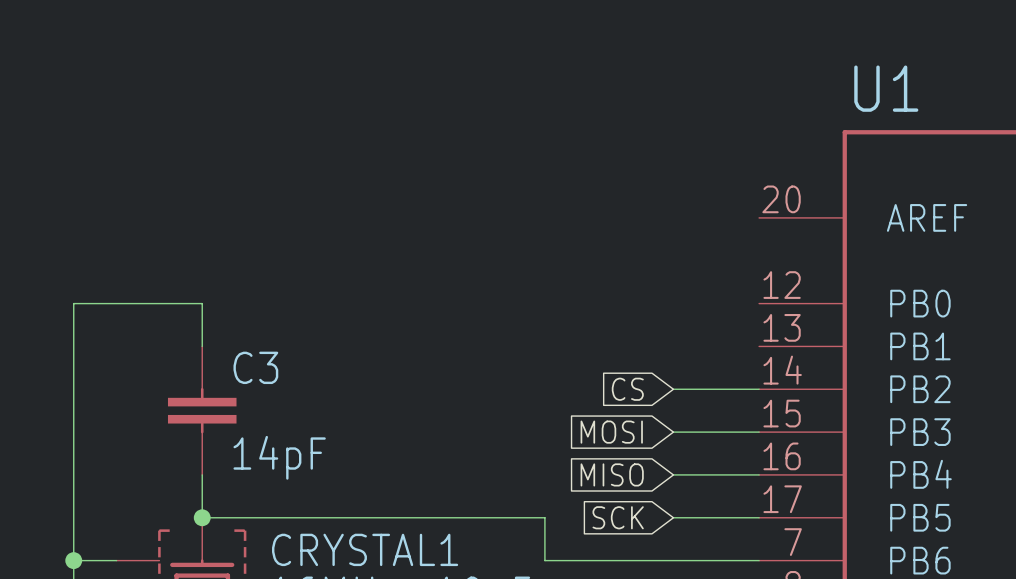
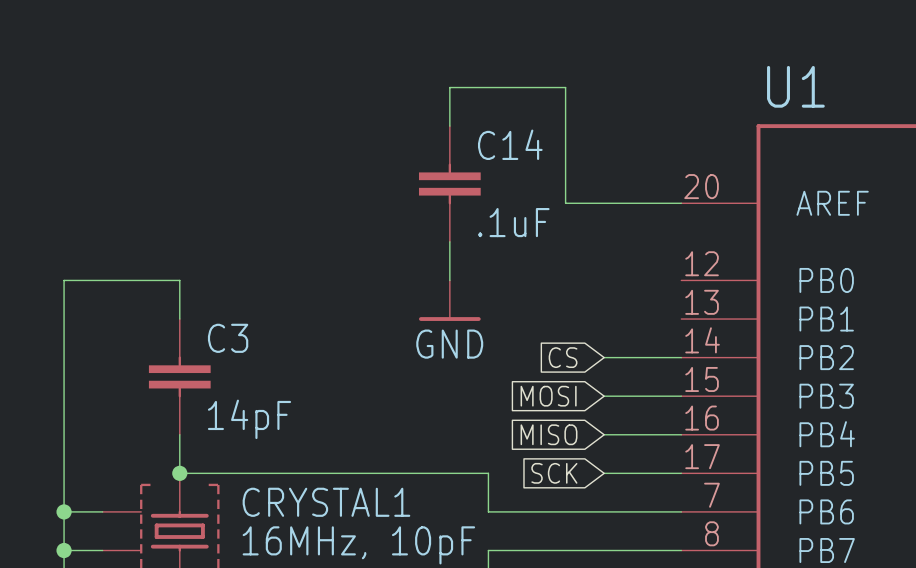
wire: none -> (449, 126) (449, 87) (565, 87) (565, 203) (681, 203)
C14: none -> .1uF (449, 183)
wire: none -> (449, 241) (449, 280)
power symbol: none -> GND (449, 300)

